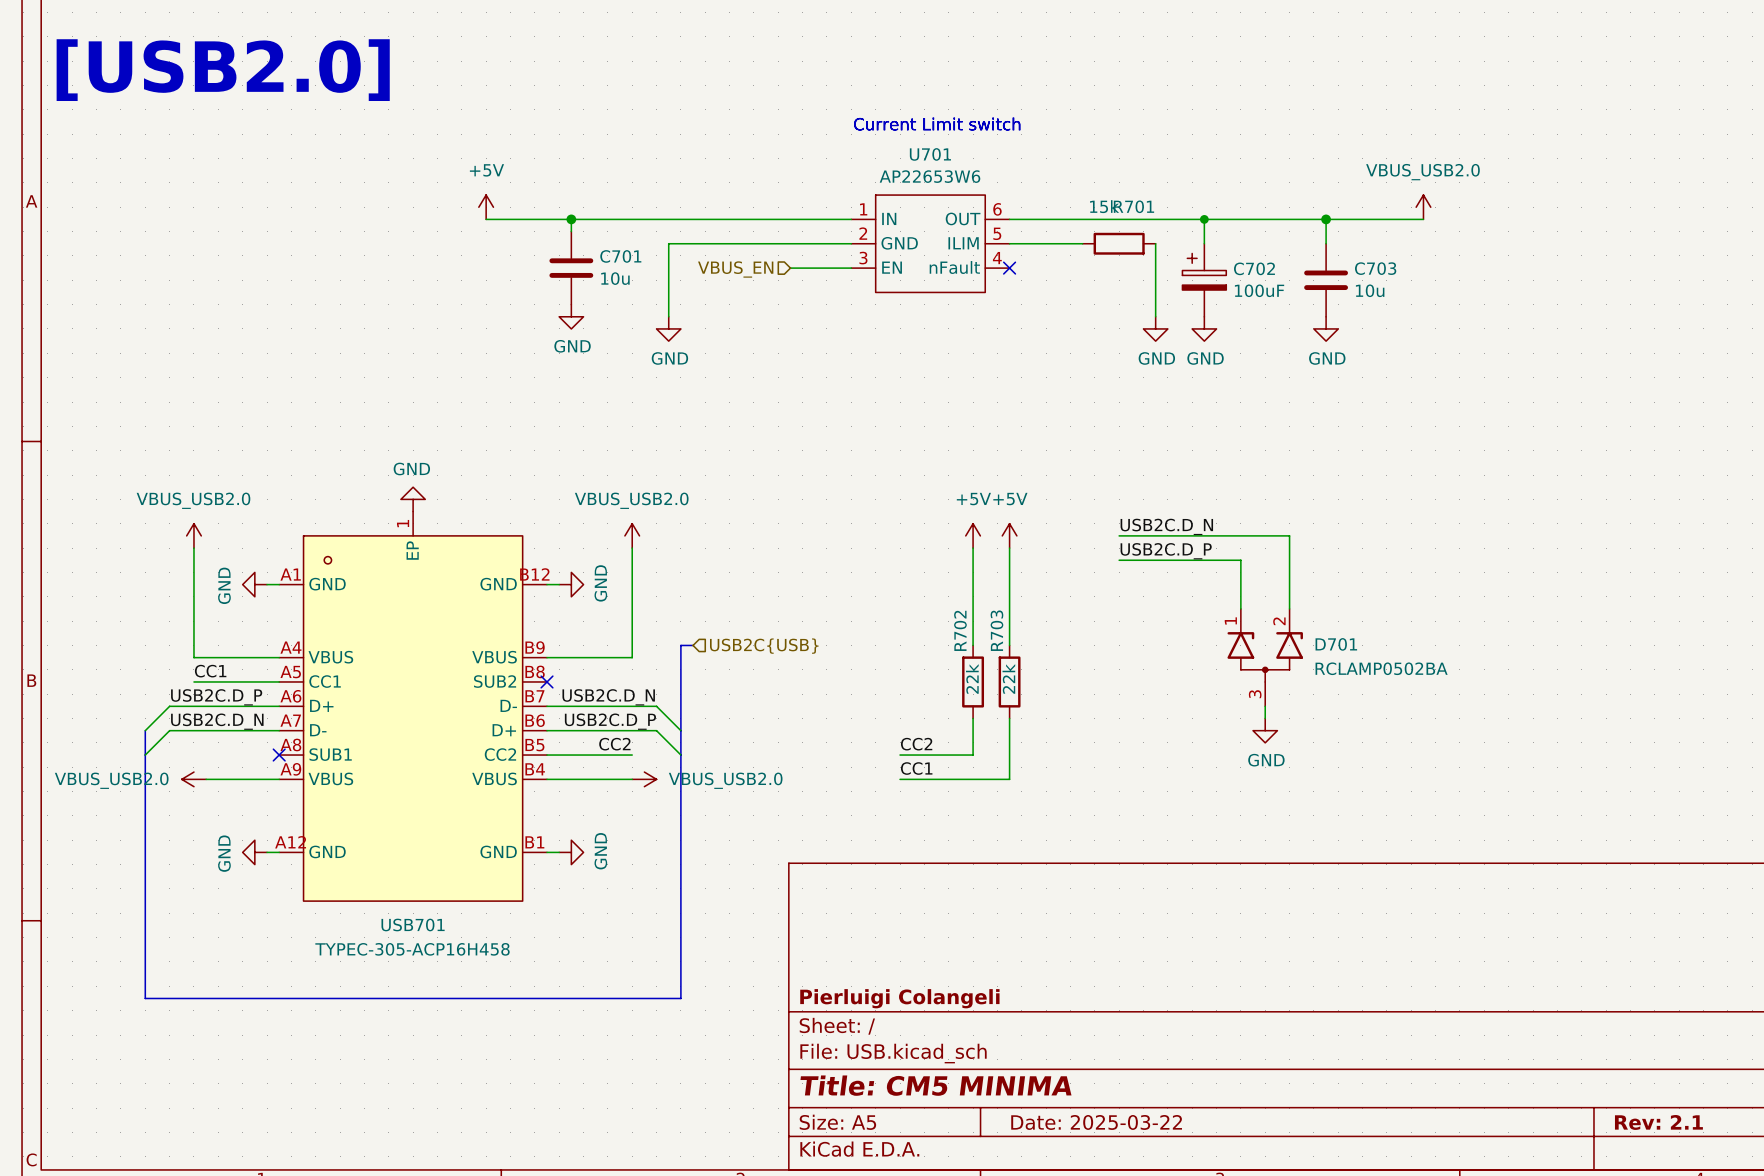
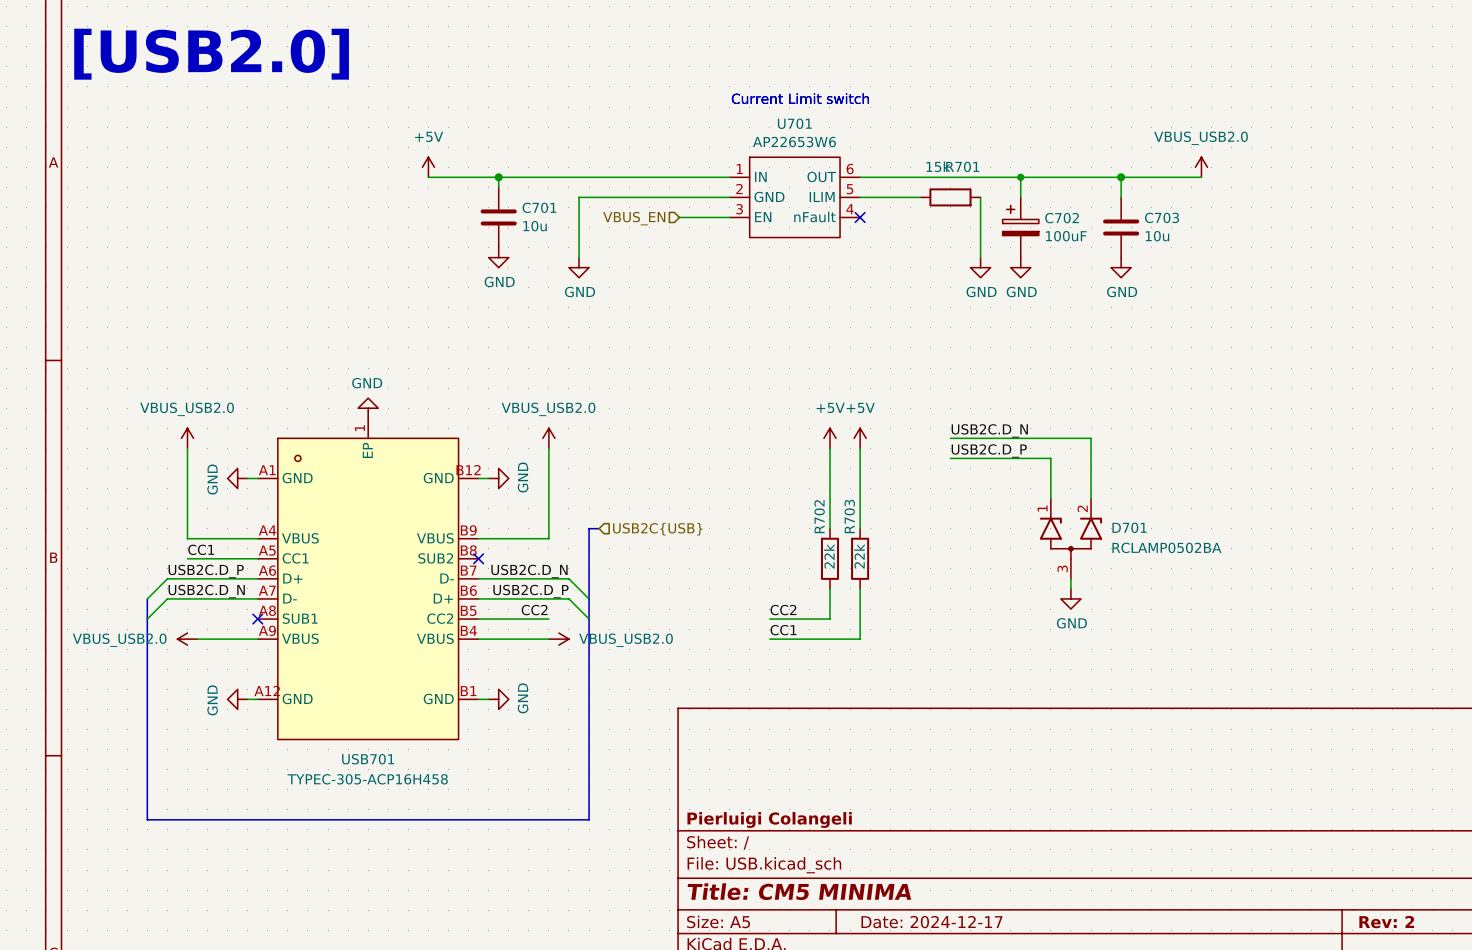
title block: Date: 2025-03-22 (1096, 1122) -> Date: 2024-12-17 (931, 922)
title block: Rev: 2.1 (1658, 1122) -> Rev: 2 (1386, 922)

